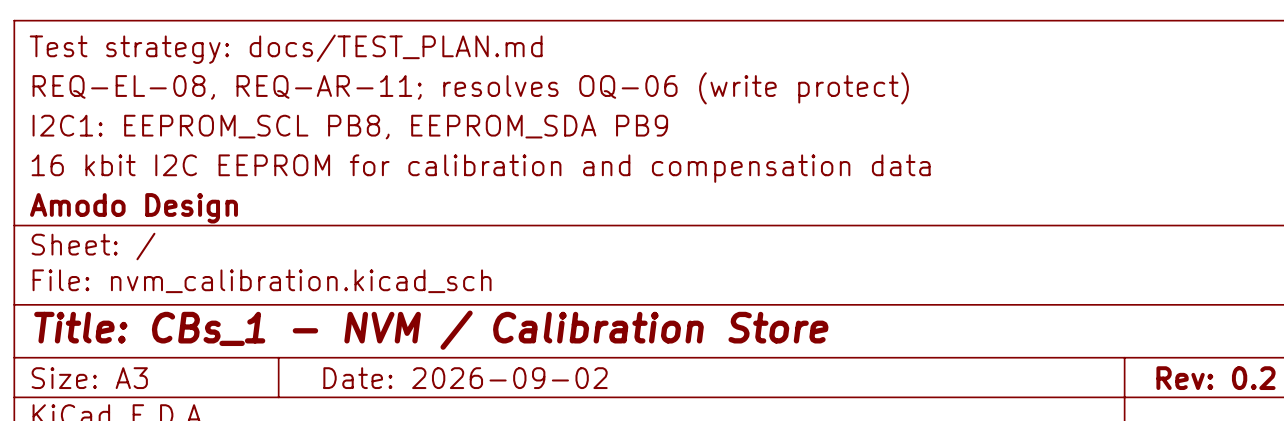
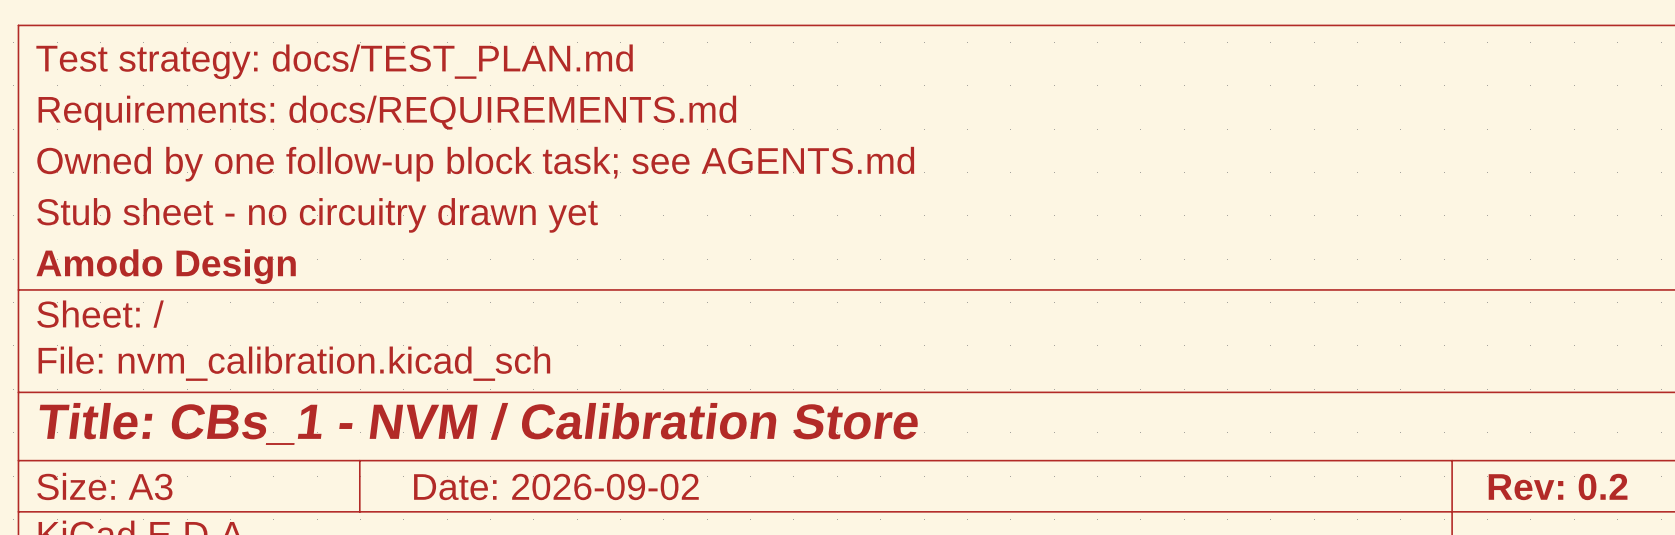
title block: REQ-EL-08, REQ-AR-11; resolves OQ-06 (write protect) (470, 88) -> Requirements: docs/REQUIREMENTS.md (387, 112)
title block: I2C1: EEPROM_SCL PB8, EEPROM_SDA PB9 (350, 127) -> Owned by one follow-up block task; see AGENTS.md (475, 164)
title block: 16 kbit I2C EEPROM for calibration and compensation data (481, 168) -> Stub sheet - no circuitry drawn yet (317, 215)

